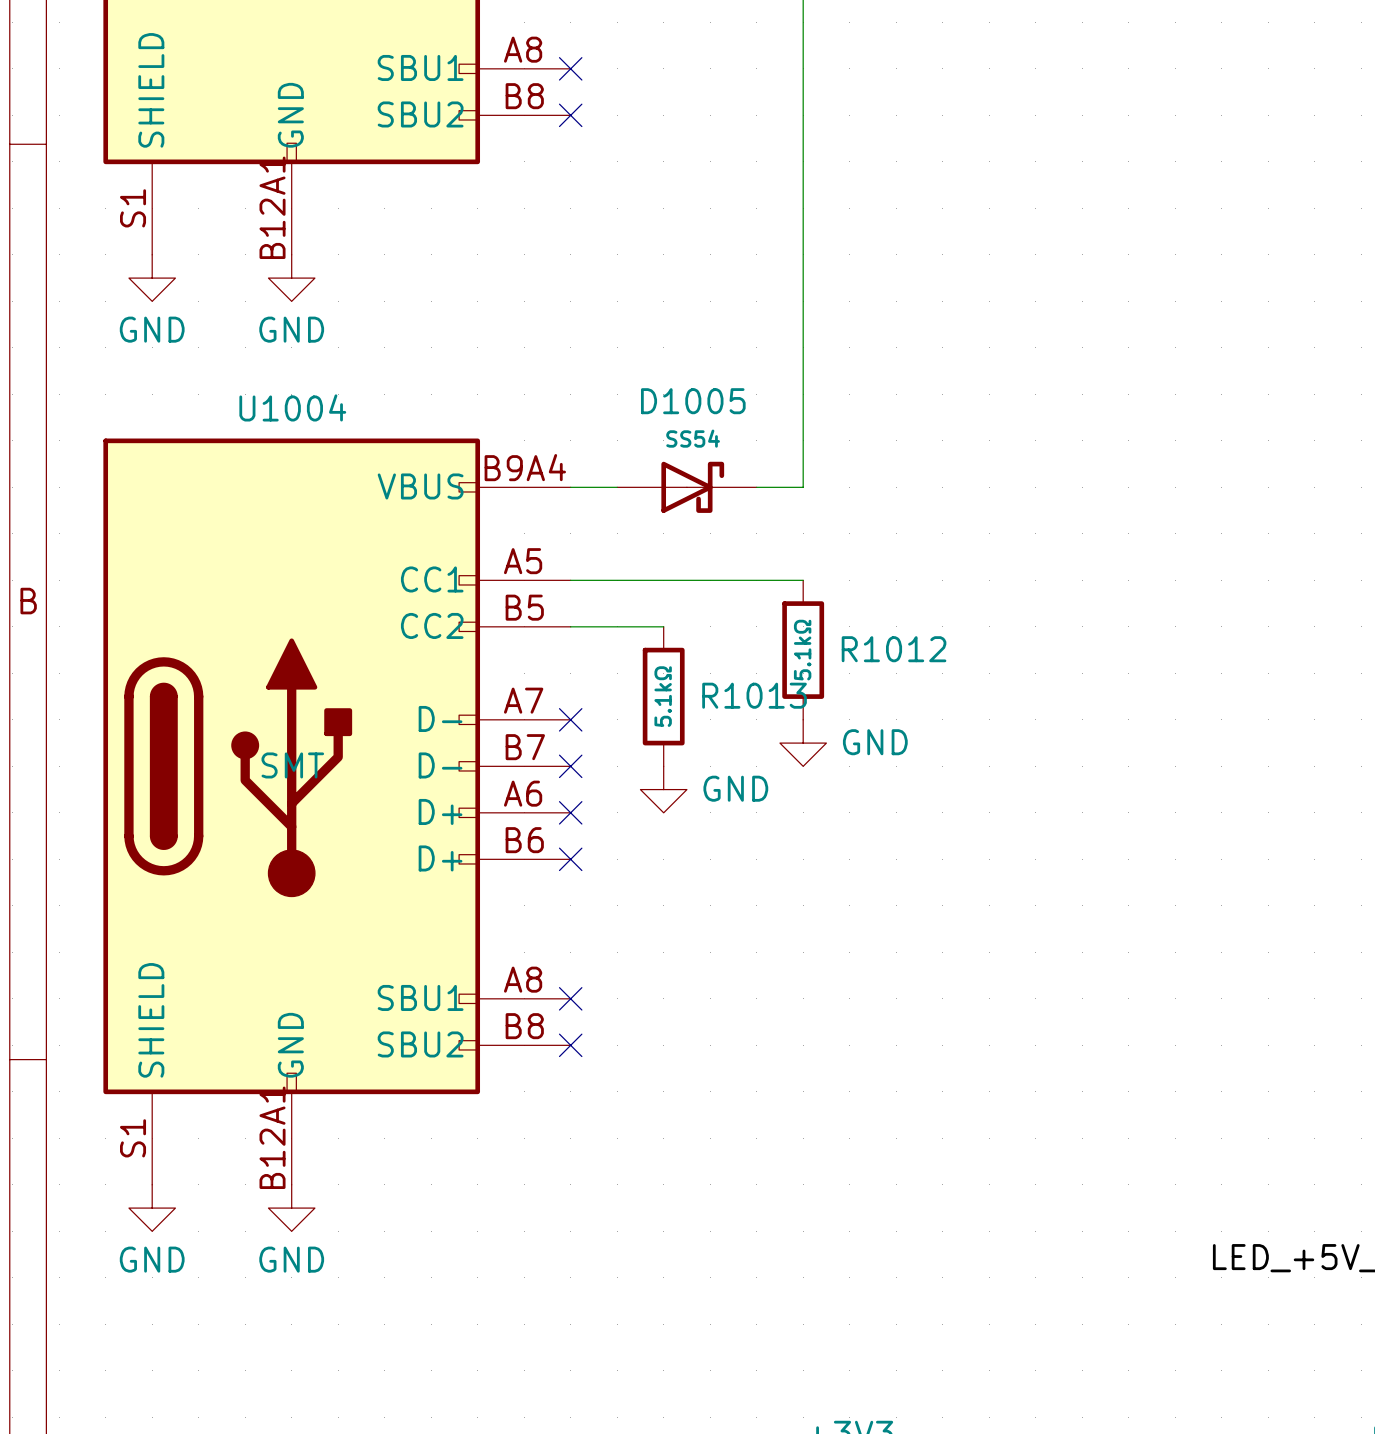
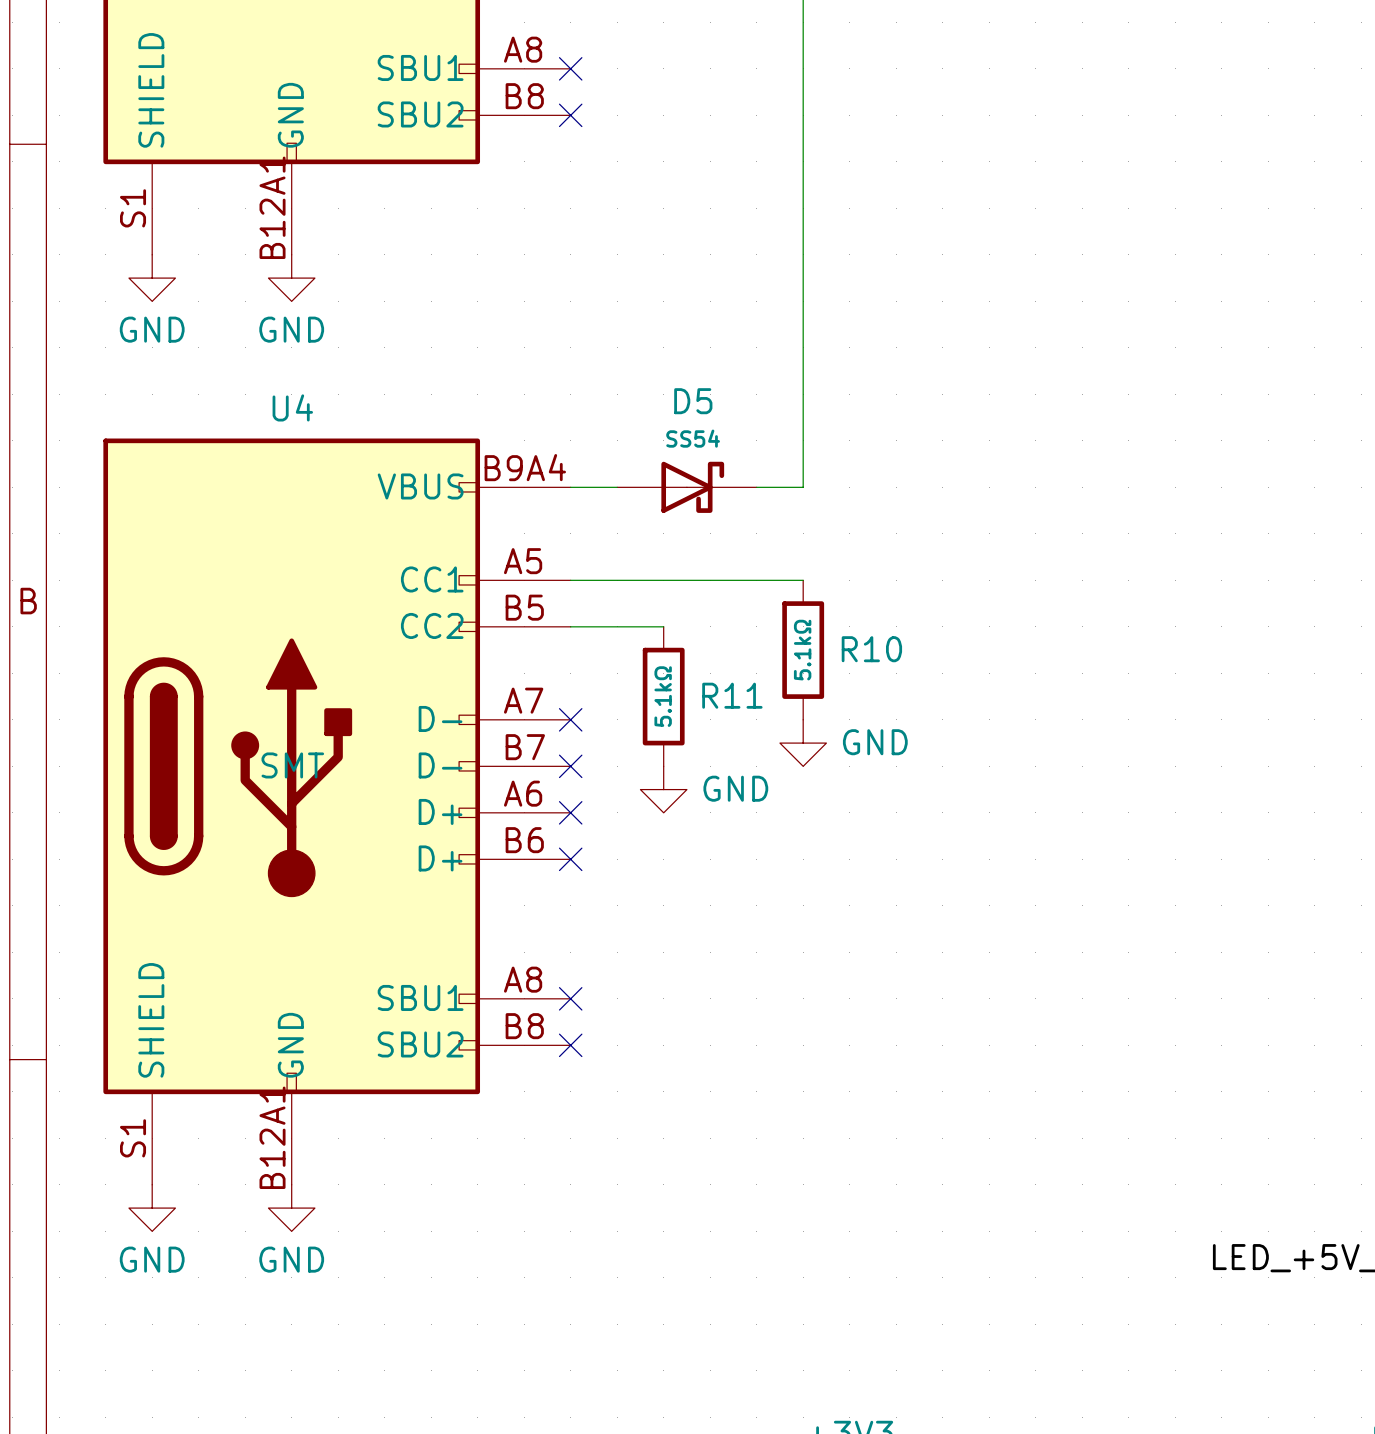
D1005 name: D1005 (693, 401) -> D5 (693, 401)
U1004 name: U1004 (292, 407) -> U4 (292, 407)
R1012 name: R1012 (894, 649) -> R10 (871, 649)
R1013 name: R1013 (754, 695) -> R11 (732, 695)

